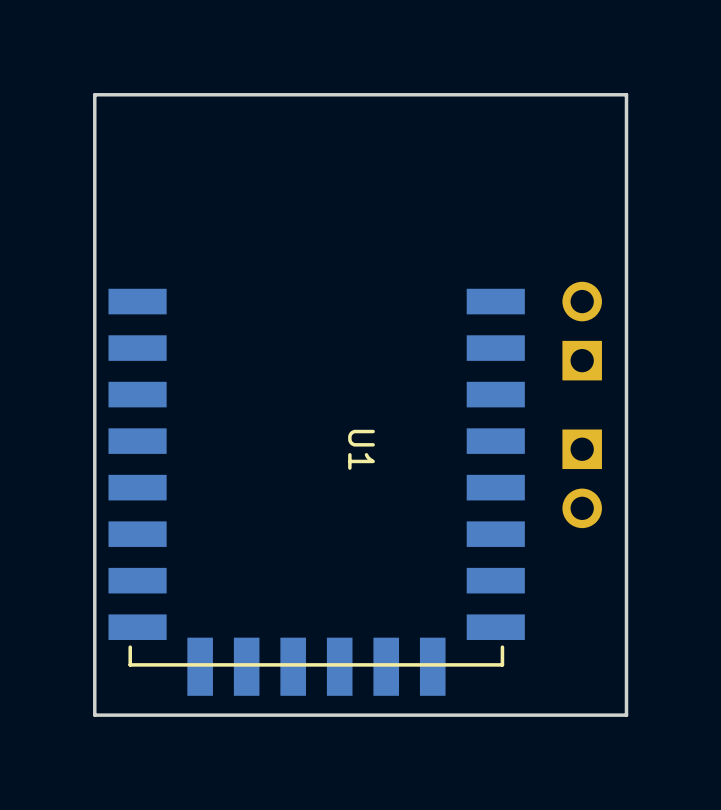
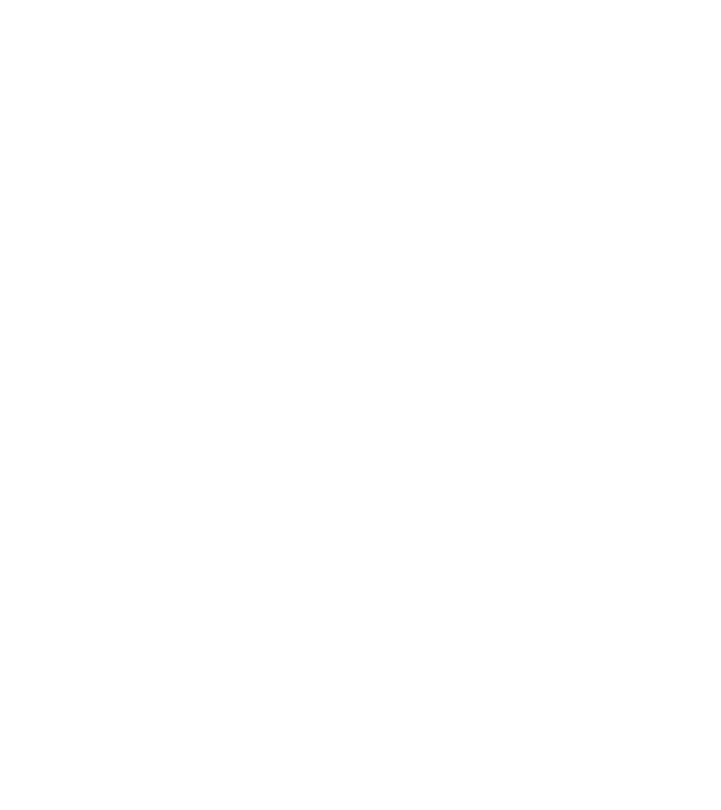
board edge: (626, 94) (626, 715) (94, 715) (94, 94) (626, 94) -> none
part: (582, 331) -> none
part: (582, 478) -> none
U1: (316, 492) -> none

